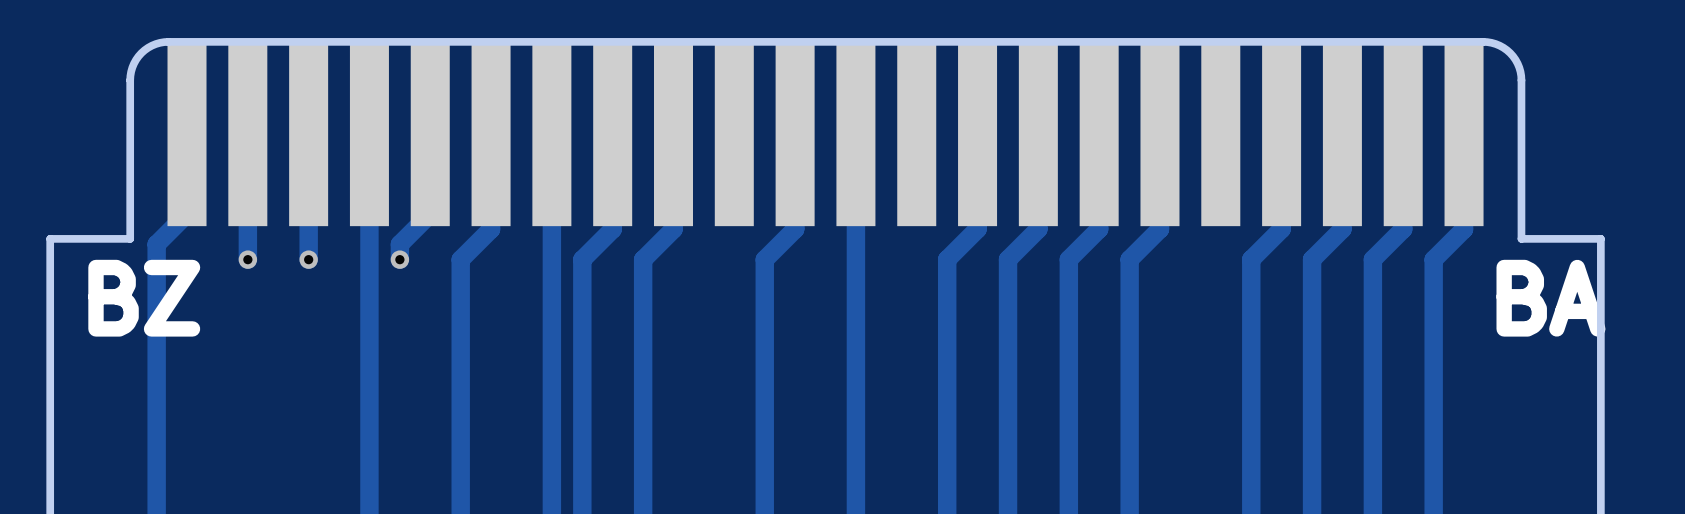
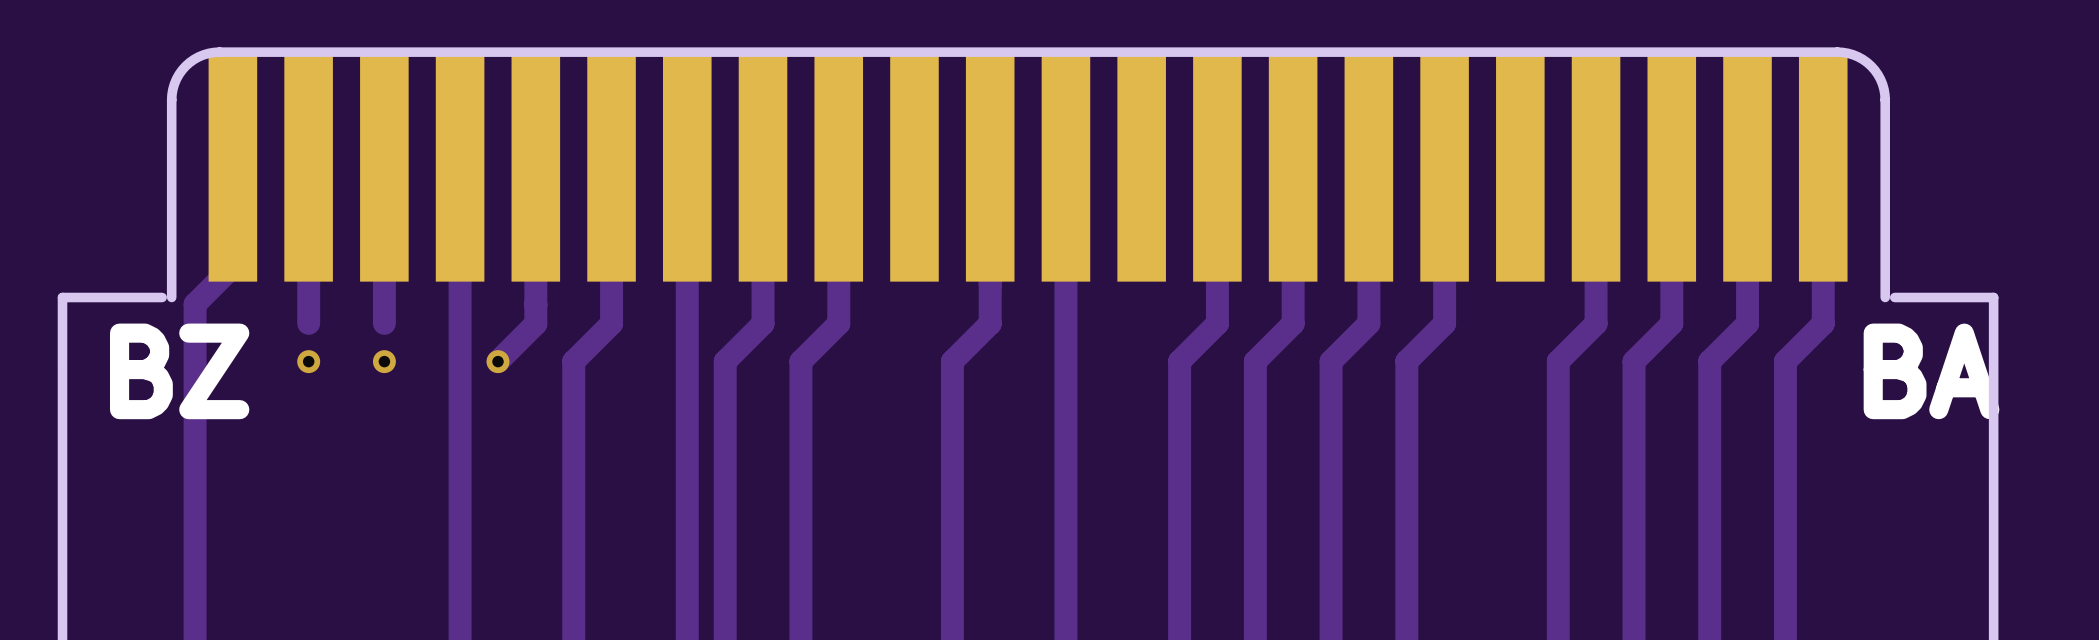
part footprint: [126, 38, 1526, 243] -> [166, 47, 1890, 303]
track: (430, 213) (399, 244) (399, 259) -> (535, 266) (535, 323) (498, 361)
track: (491, 229) (460, 259) (460, 290) -> (611, 285) (611, 323) (573, 361)
track: (612, 229) (582, 259) (582, 290) -> (763, 285) (763, 323) (725, 361)
track: (673, 229) (643, 259) (643, 290) -> (838, 285) (838, 323) (800, 361)
track: (795, 229) (764, 259) (764, 290) -> (990, 285) (990, 323) (952, 361)
track: (977, 229) (947, 259) (947, 290) -> (1217, 285) (1217, 323) (1179, 361)
track: (1038, 229) (1008, 259) (1008, 290) -> (1293, 285) (1293, 323) (1255, 361)
track: (1099, 229) (1068, 259) (1068, 290) -> (1368, 285) (1368, 323) (1331, 361)
track: (1160, 229) (1129, 259) (1129, 290) -> (1444, 285) (1444, 323) (1406, 361)
track: (1281, 229) (1251, 259) (1251, 290) -> (1596, 285) (1596, 323) (1558, 361)
track: (1342, 229) (1312, 259) (1312, 290) -> (1671, 285) (1671, 323) (1634, 361)
track: (1403, 229) (1372, 259) (1372, 290) -> (1747, 285) (1747, 323) (1709, 361)
track: (1464, 229) (1433, 259) (1433, 290) -> (1823, 285) (1823, 323) (1785, 361)
via position: (247, 259) -> (308, 361)
via position: (308, 259) -> (384, 361)
via position: (399, 259) -> (498, 361)

